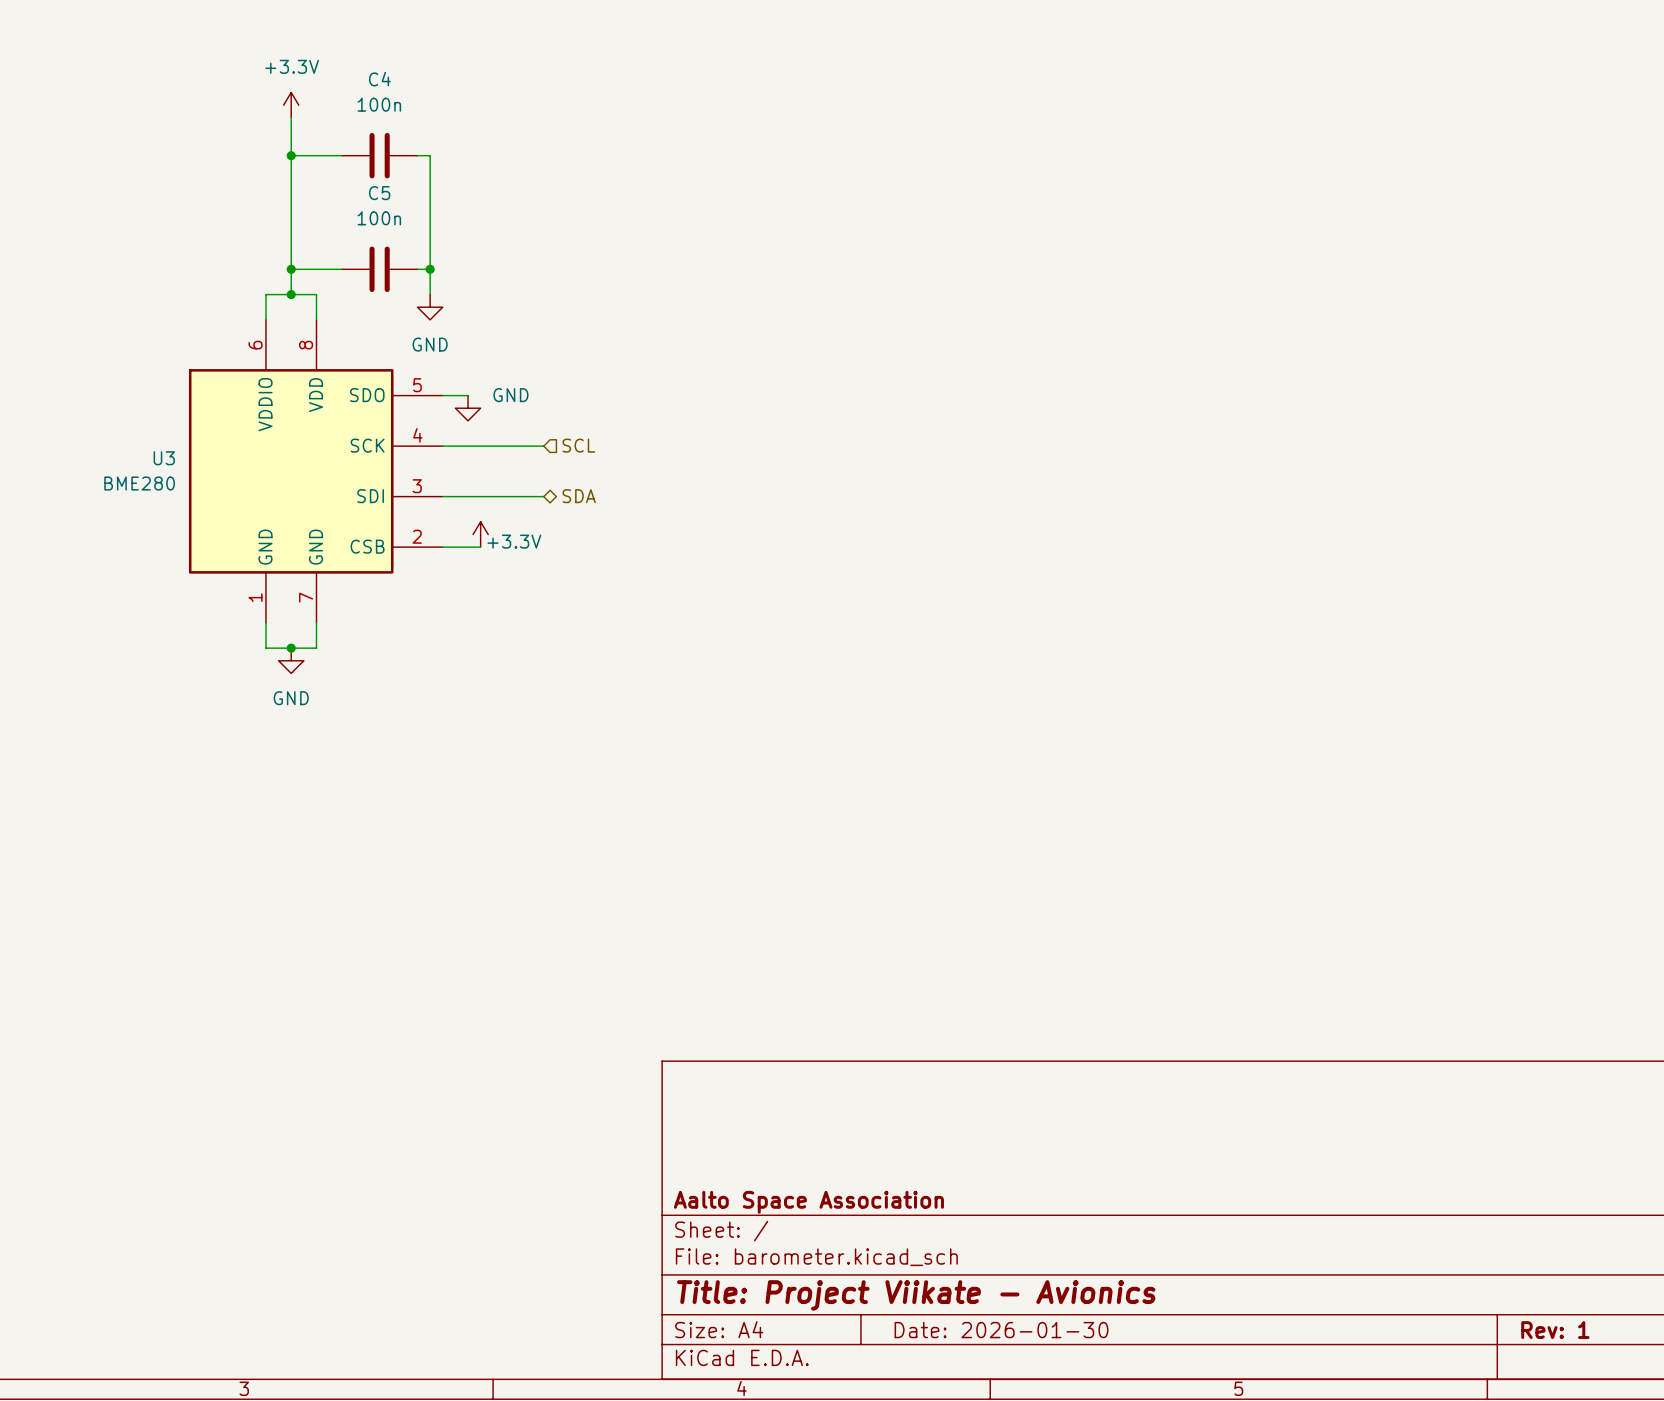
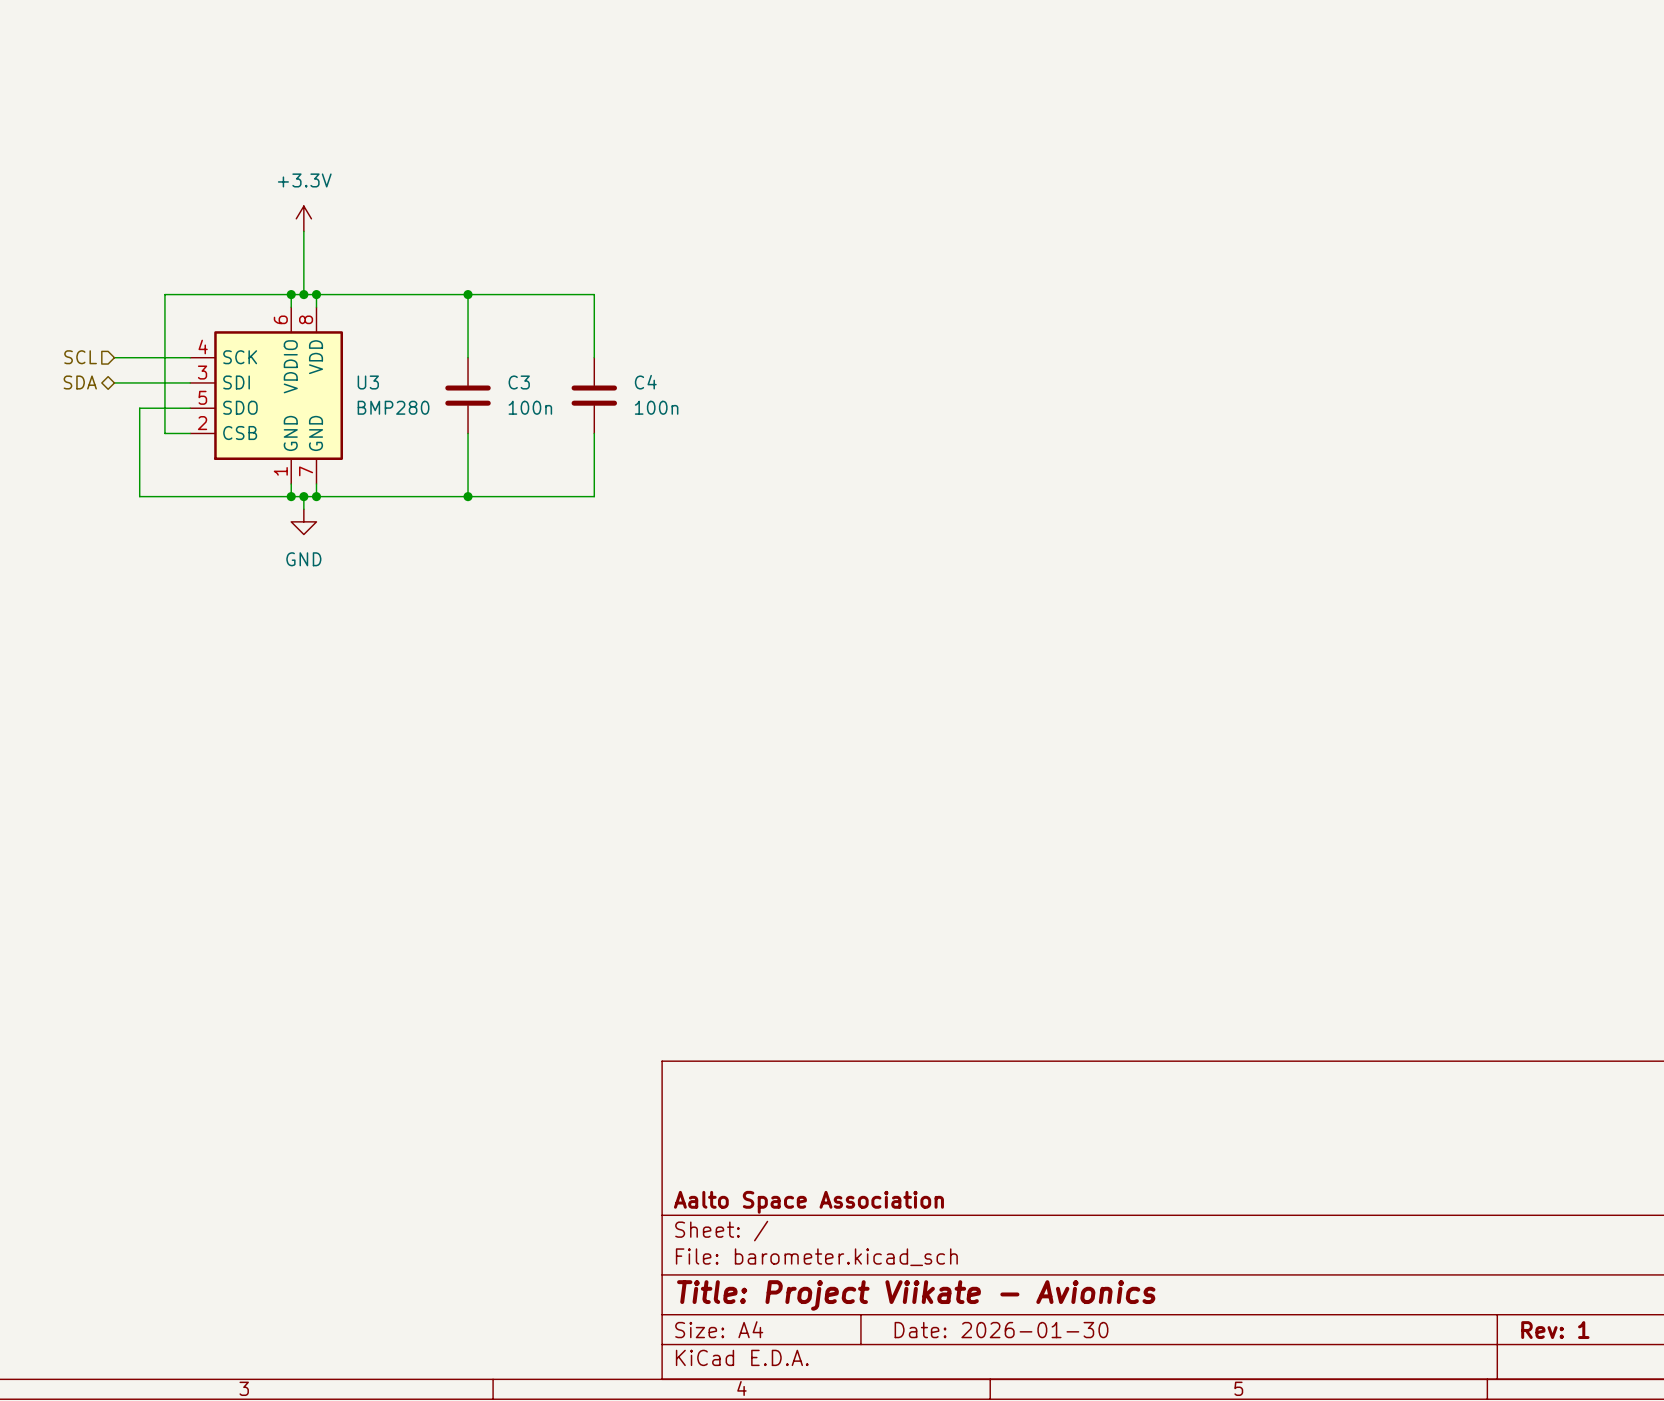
C4 name position: C4 (379, 79) -> C4 (645, 382)
C4 value position: 100n (379, 104) -> 100n (656, 407)
power symbol position: +3.3V (291, 105) -> +3.3V (303, 218)
wire: (291, 117) (291, 294) -> (291, 307) (291, 294)
wire: (291, 155) (341, 155) -> none
junction: (291, 155) -> none
C4 rotation: 0° (379, 155) -> 90° clockwise (594, 395)
C4 position: (379, 155) -> (594, 395)
wire: (417, 155) (430, 155) (430, 294) -> none
wire: none -> (303, 231) (303, 294)
wire: (291, 269) (341, 269) -> none
junction: (291, 269) -> none
C5: 100n (379, 269) -> none
wire: (417, 269) (430, 269) -> none
junction position: (430, 269) -> (468, 294)
wire: (265, 294) (265, 319) -> (265, 294) (164, 294) (164, 433) (190, 433)
junction: none -> (303, 294)
wire: none -> (316, 294) (594, 294) (594, 357)
junction: none -> (316, 294)
wire: none -> (468, 294) (468, 357)
power symbol: GND (430, 307) -> none
U3 symbol: [188, 319, 443, 623] -> [190, 307, 344, 484]
hierarchical label: none -> SCL (80, 357)
wire: none -> (114, 357) (190, 357)
hierarchical label: none -> SDA (80, 382)
wire: none -> (114, 382) (190, 382)
wire: (442, 395) (468, 395) -> none
C3: none -> 100n (468, 395)
wire: none -> (190, 408) (139, 408) (139, 496) (442, 496)
power symbol: GND (468, 408) -> none
wire: none -> (468, 433) (468, 496)
wire: none -> (594, 433) (594, 496) (543, 496)
hierarchical label: SCL (578, 445) -> none
wire: (442, 446) (543, 446) -> none
U3 name position: U3 (164, 458) -> U3 (368, 382)
U3 value: BME280 (139, 483) -> BMP280 (393, 407)
junction: none -> (291, 496)
junction: none -> (303, 496)
junction: none -> (316, 496)
junction: none -> (468, 496)
hierarchical label: SDA (579, 496) -> none
power symbol: none -> GND (303, 521)
power symbol: +3.3V (480, 534) -> none
wire: (442, 547) (480, 547) -> none
wire: (265, 622) (265, 648) (316, 648) (316, 622) -> none
junction: (291, 648) -> none
power symbol: GND (291, 660) -> none

